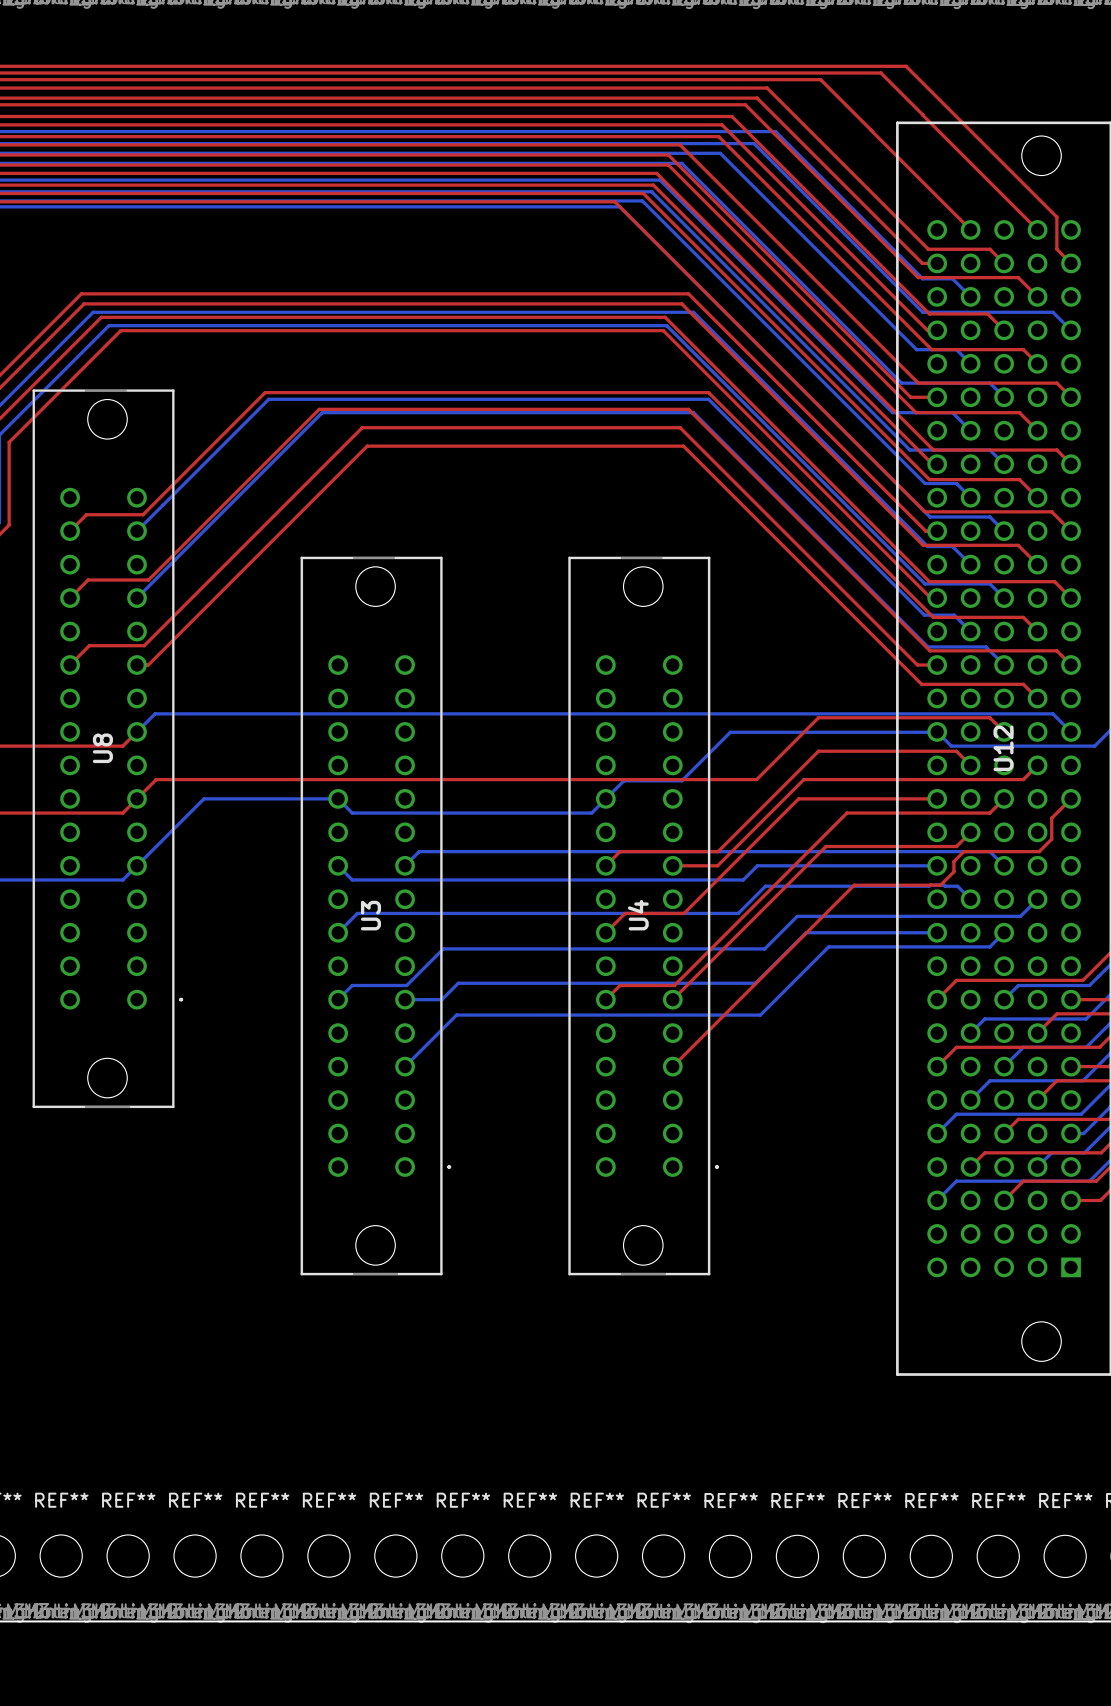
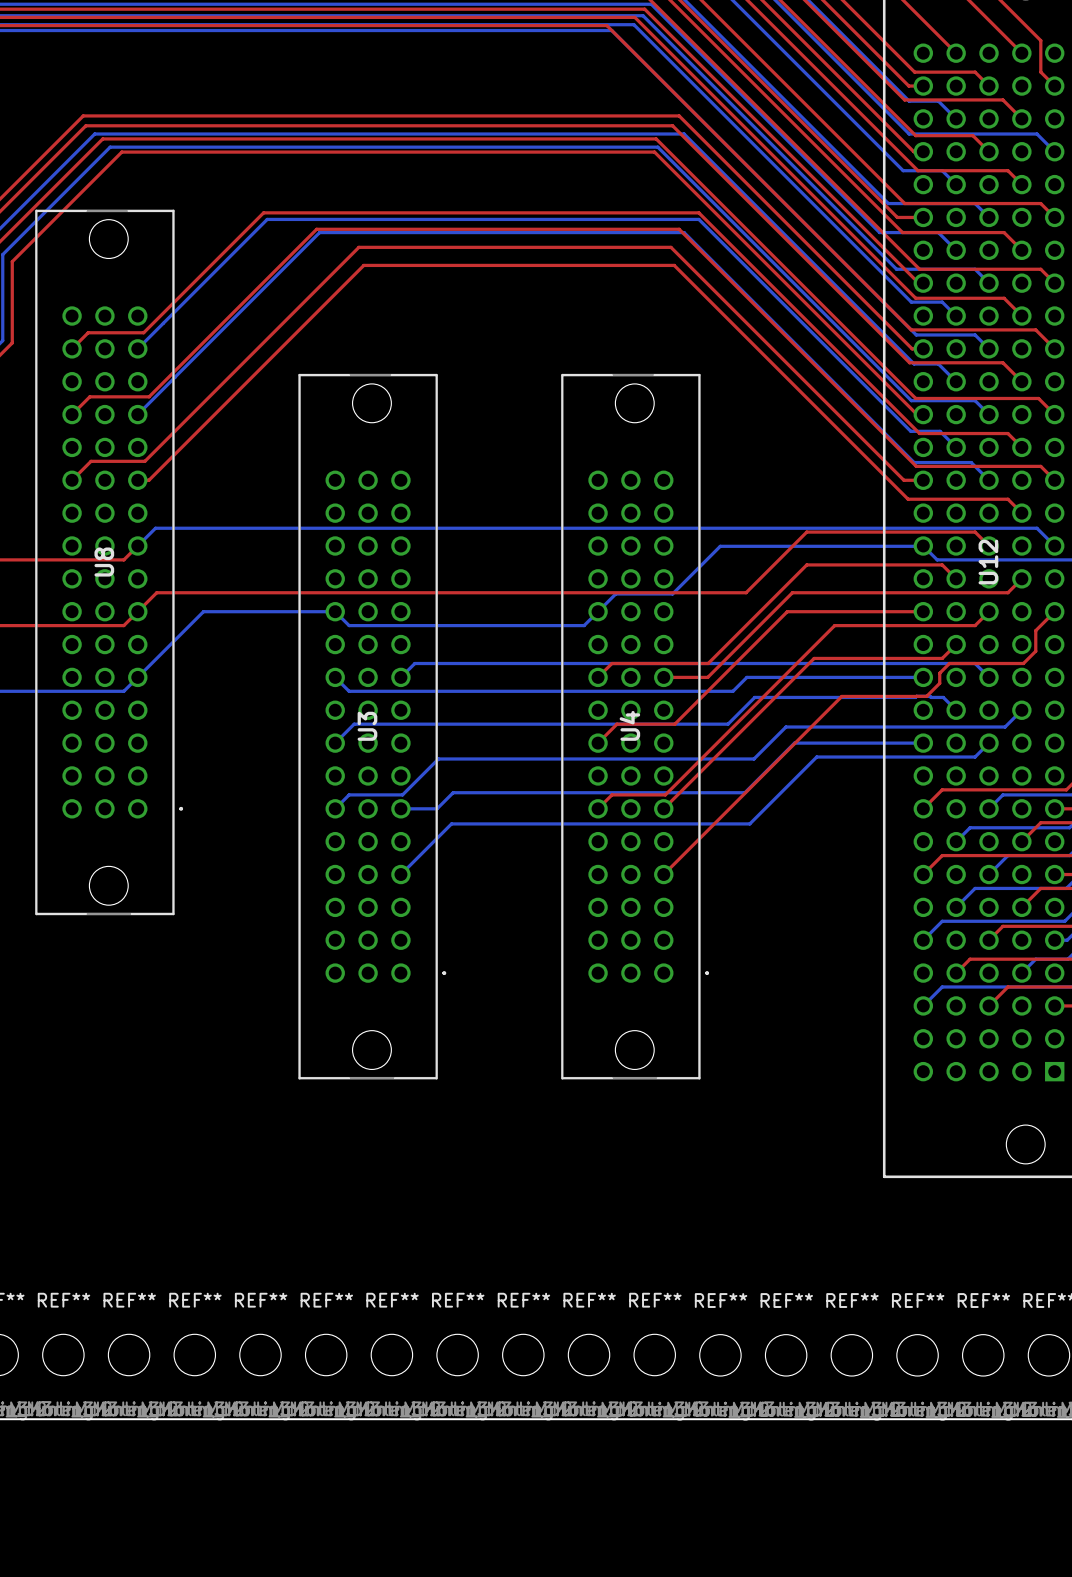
U8 footprint: [32, 389, 184, 1109] -> [35, 209, 184, 916]
U3 footprint: [300, 556, 452, 1276] -> [298, 373, 447, 1080]
U4 footprint: [568, 556, 719, 1276] -> [561, 373, 710, 1080]

